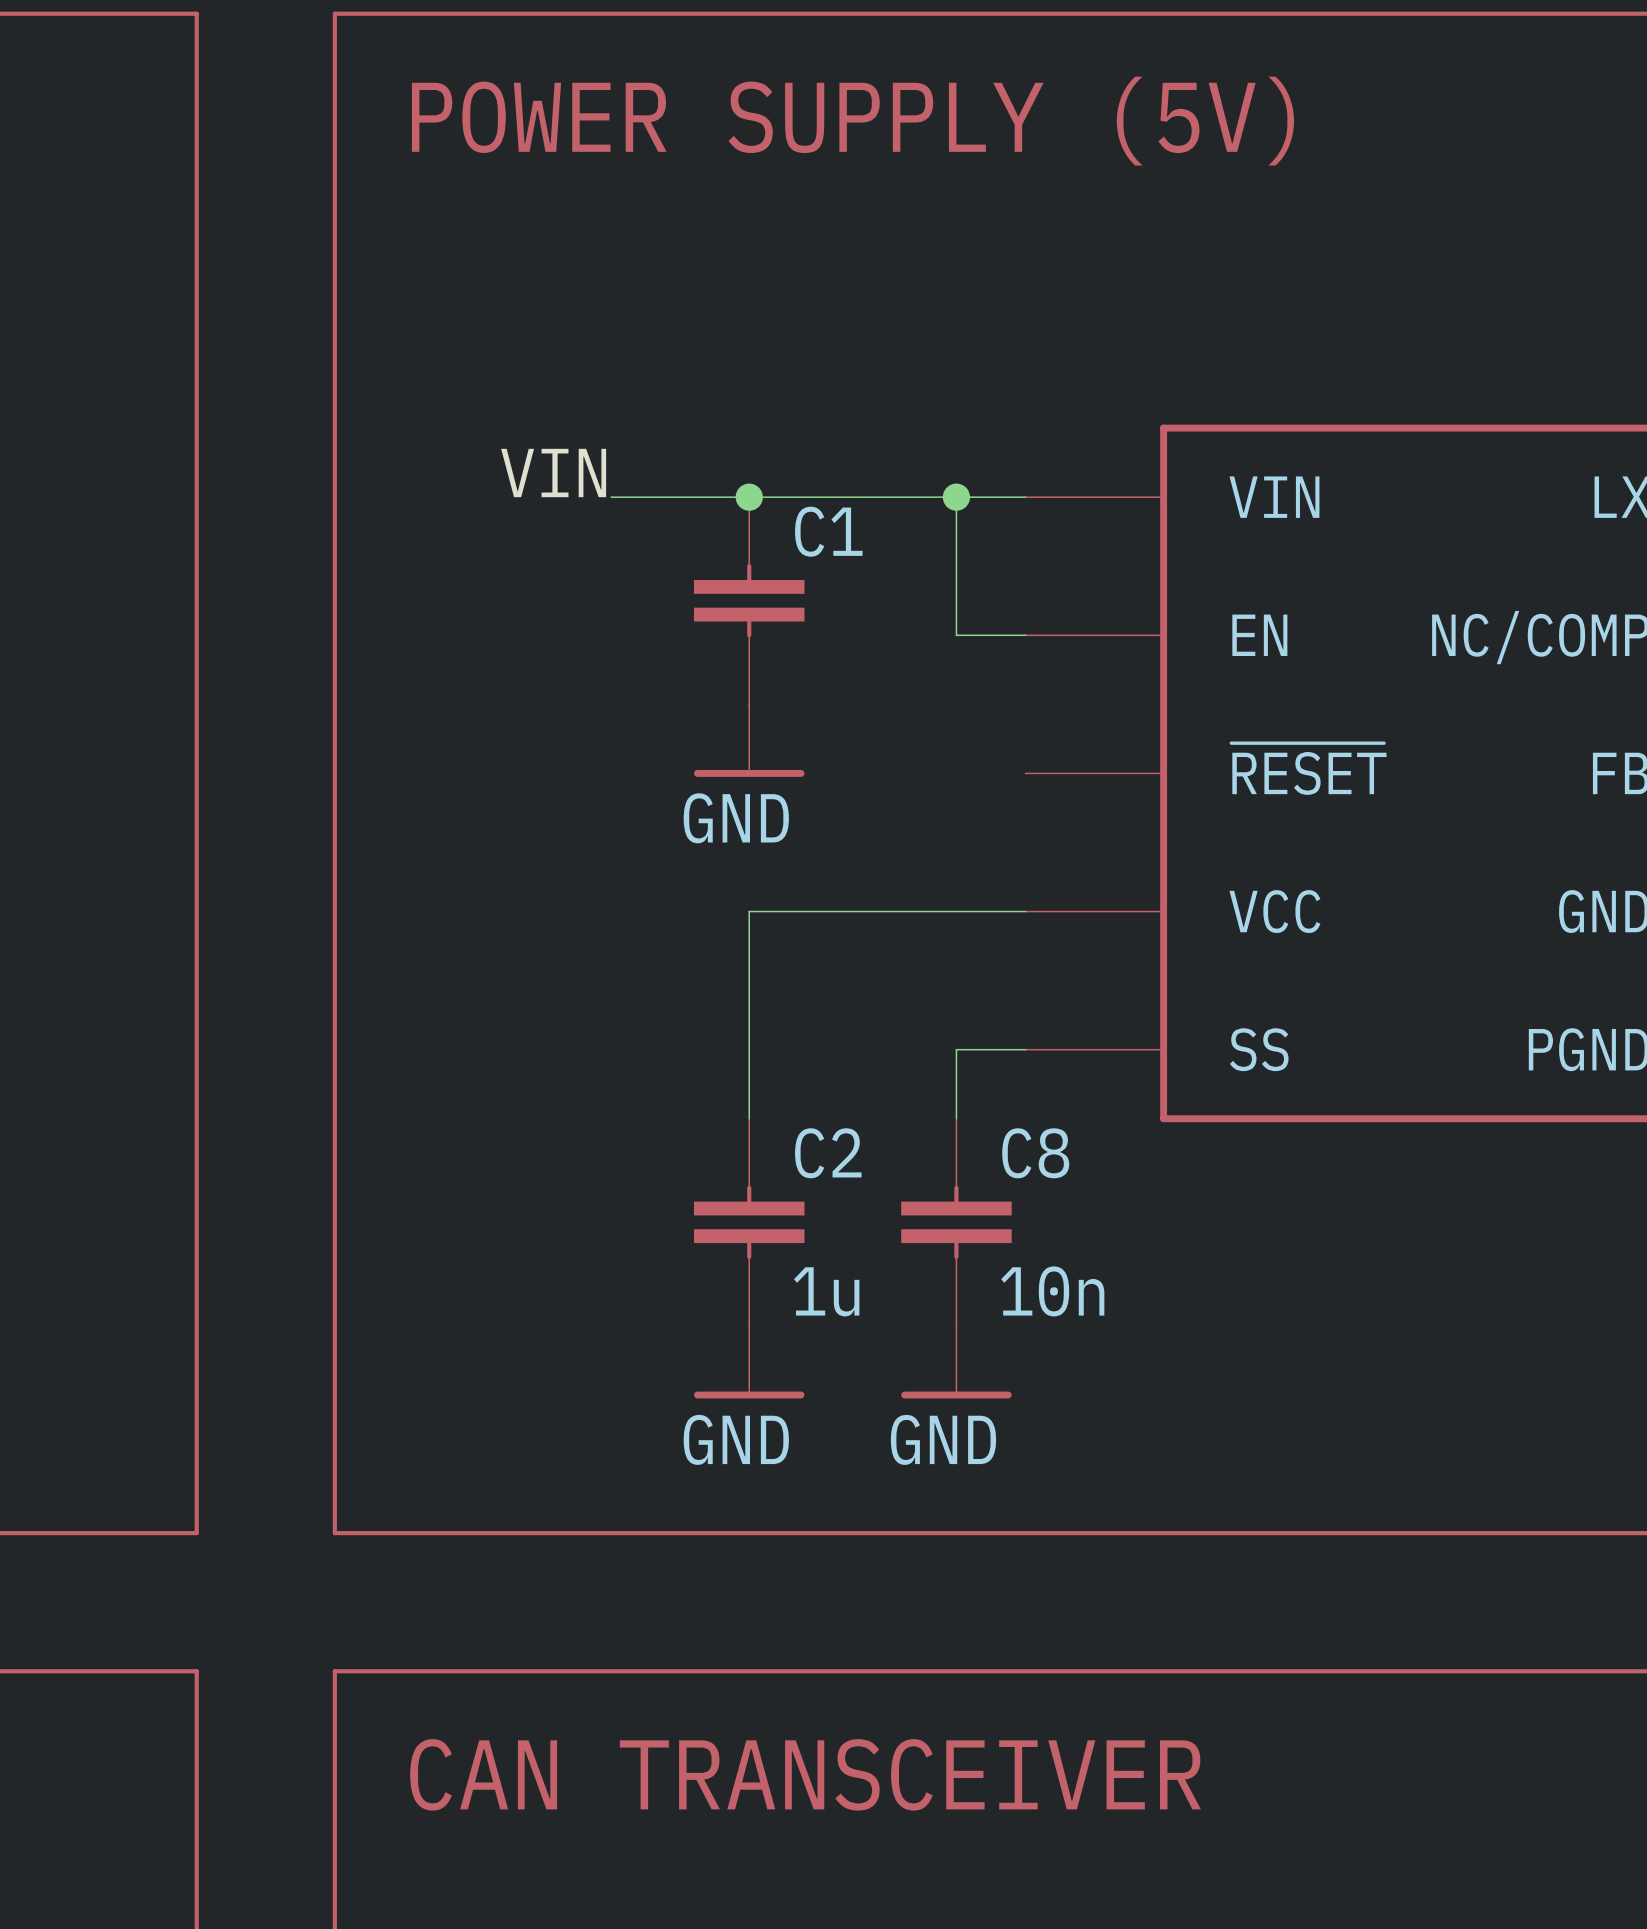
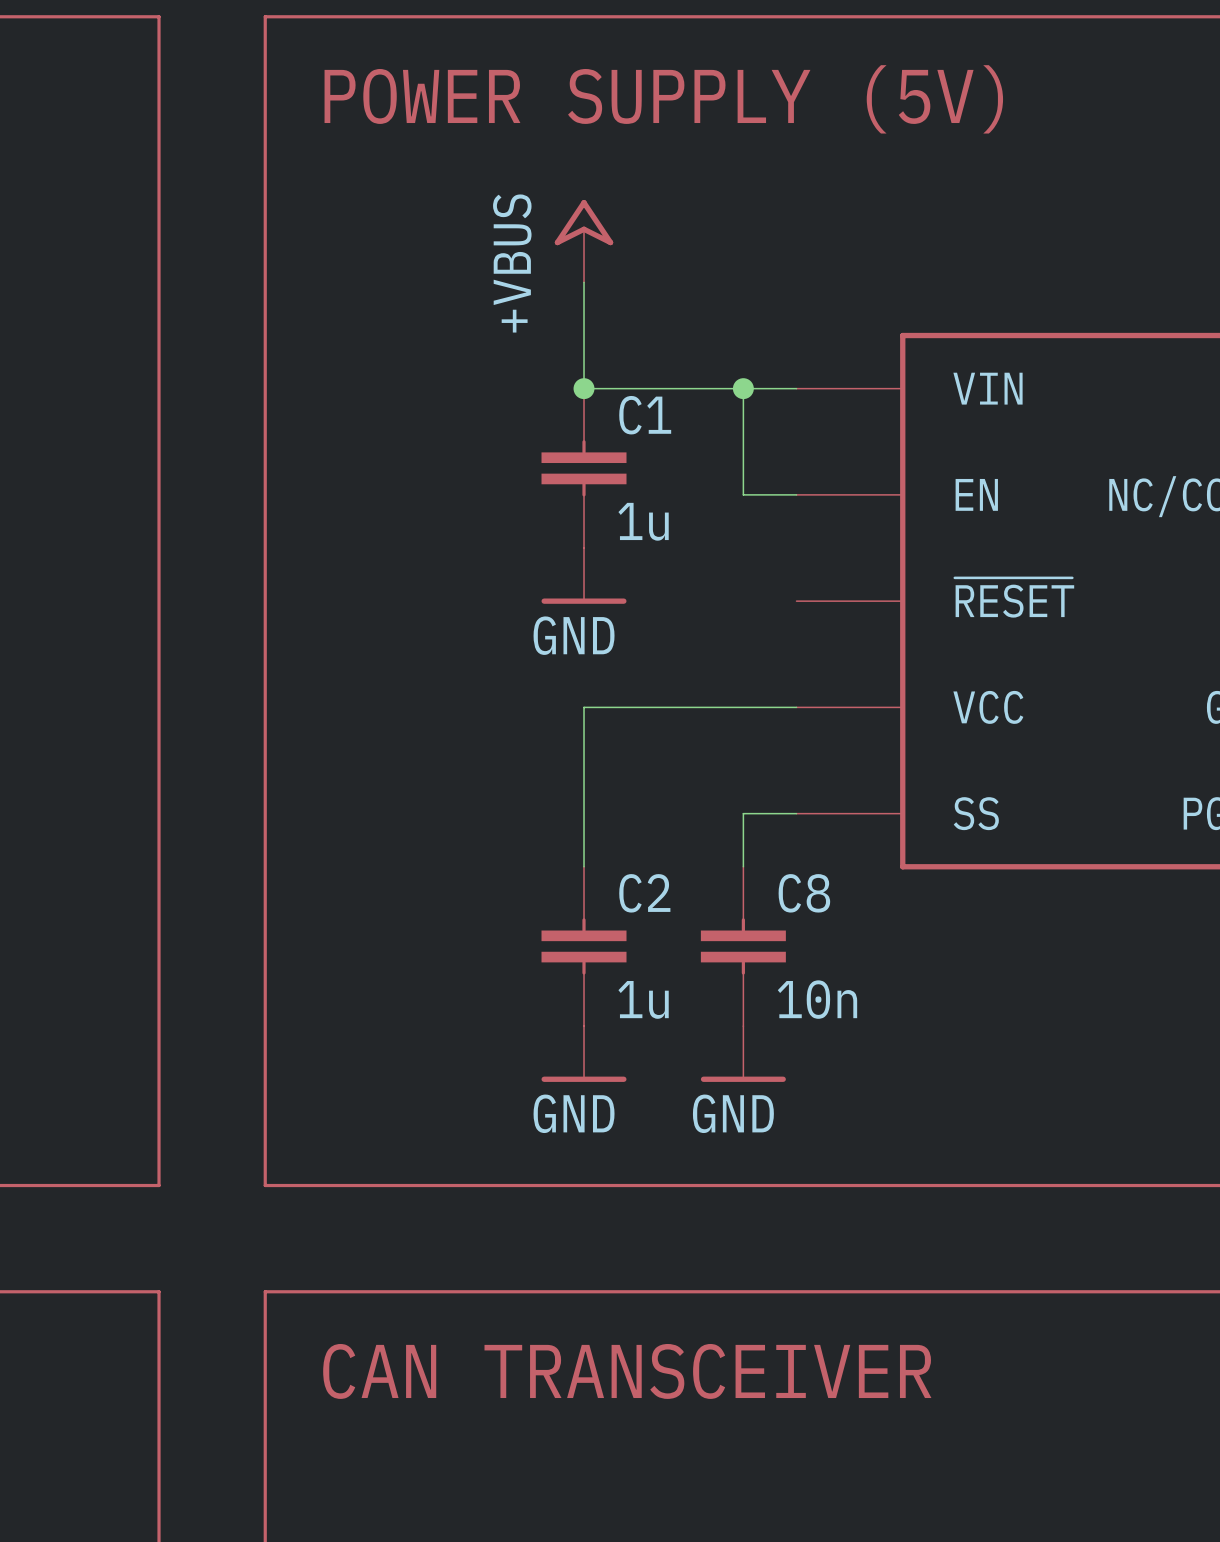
power symbol: none -> +VBUS (584, 241)
label: VIN (553, 472) -> none
wire: (611, 497) (749, 497) -> (584, 282) (584, 388)
C1 value: none -> 1u (643, 521)

